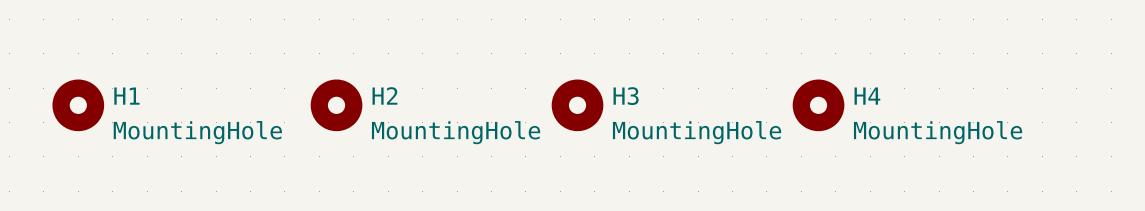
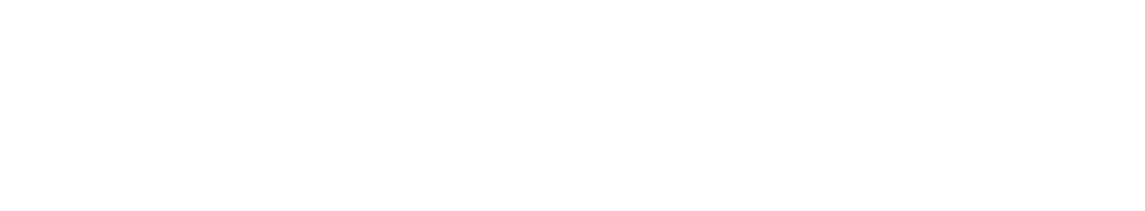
H1: MountingHole (78, 105) -> none
H2: MountingHole (336, 105) -> none
H3: MountingHole (577, 105) -> none
H4: MountingHole (818, 105) -> none

